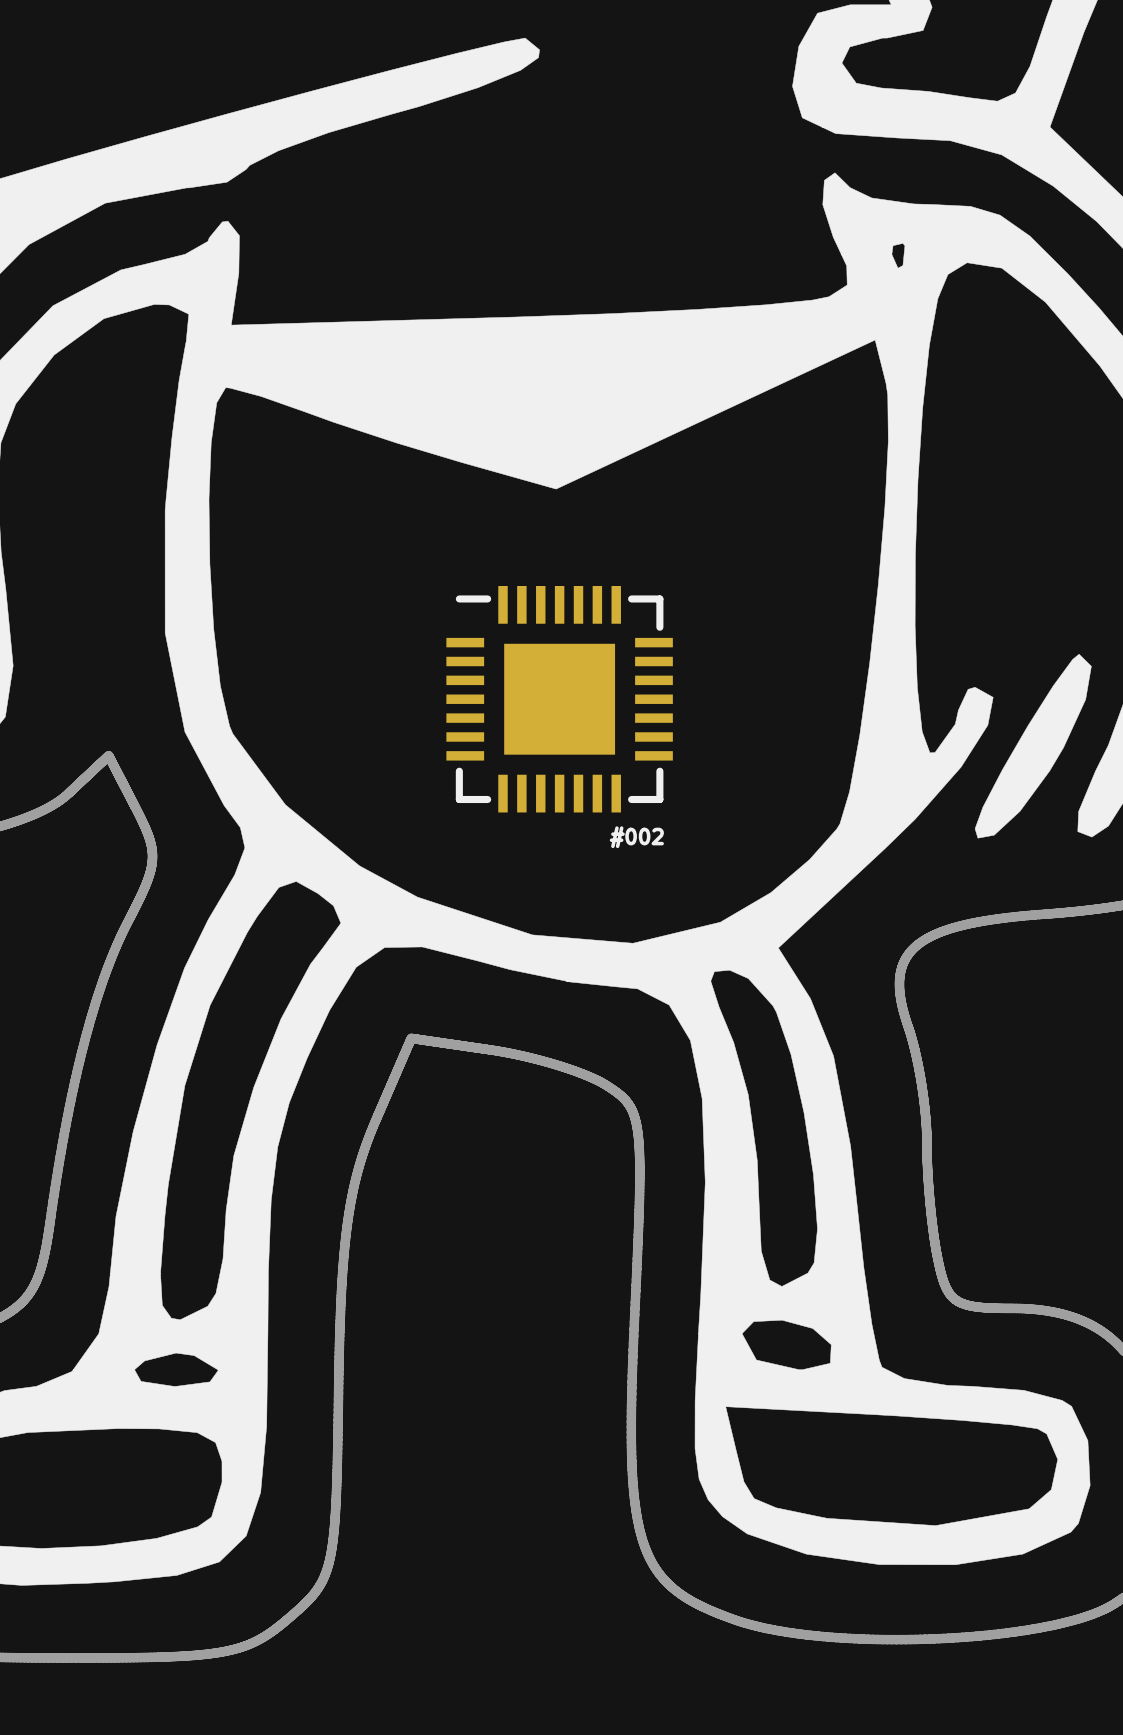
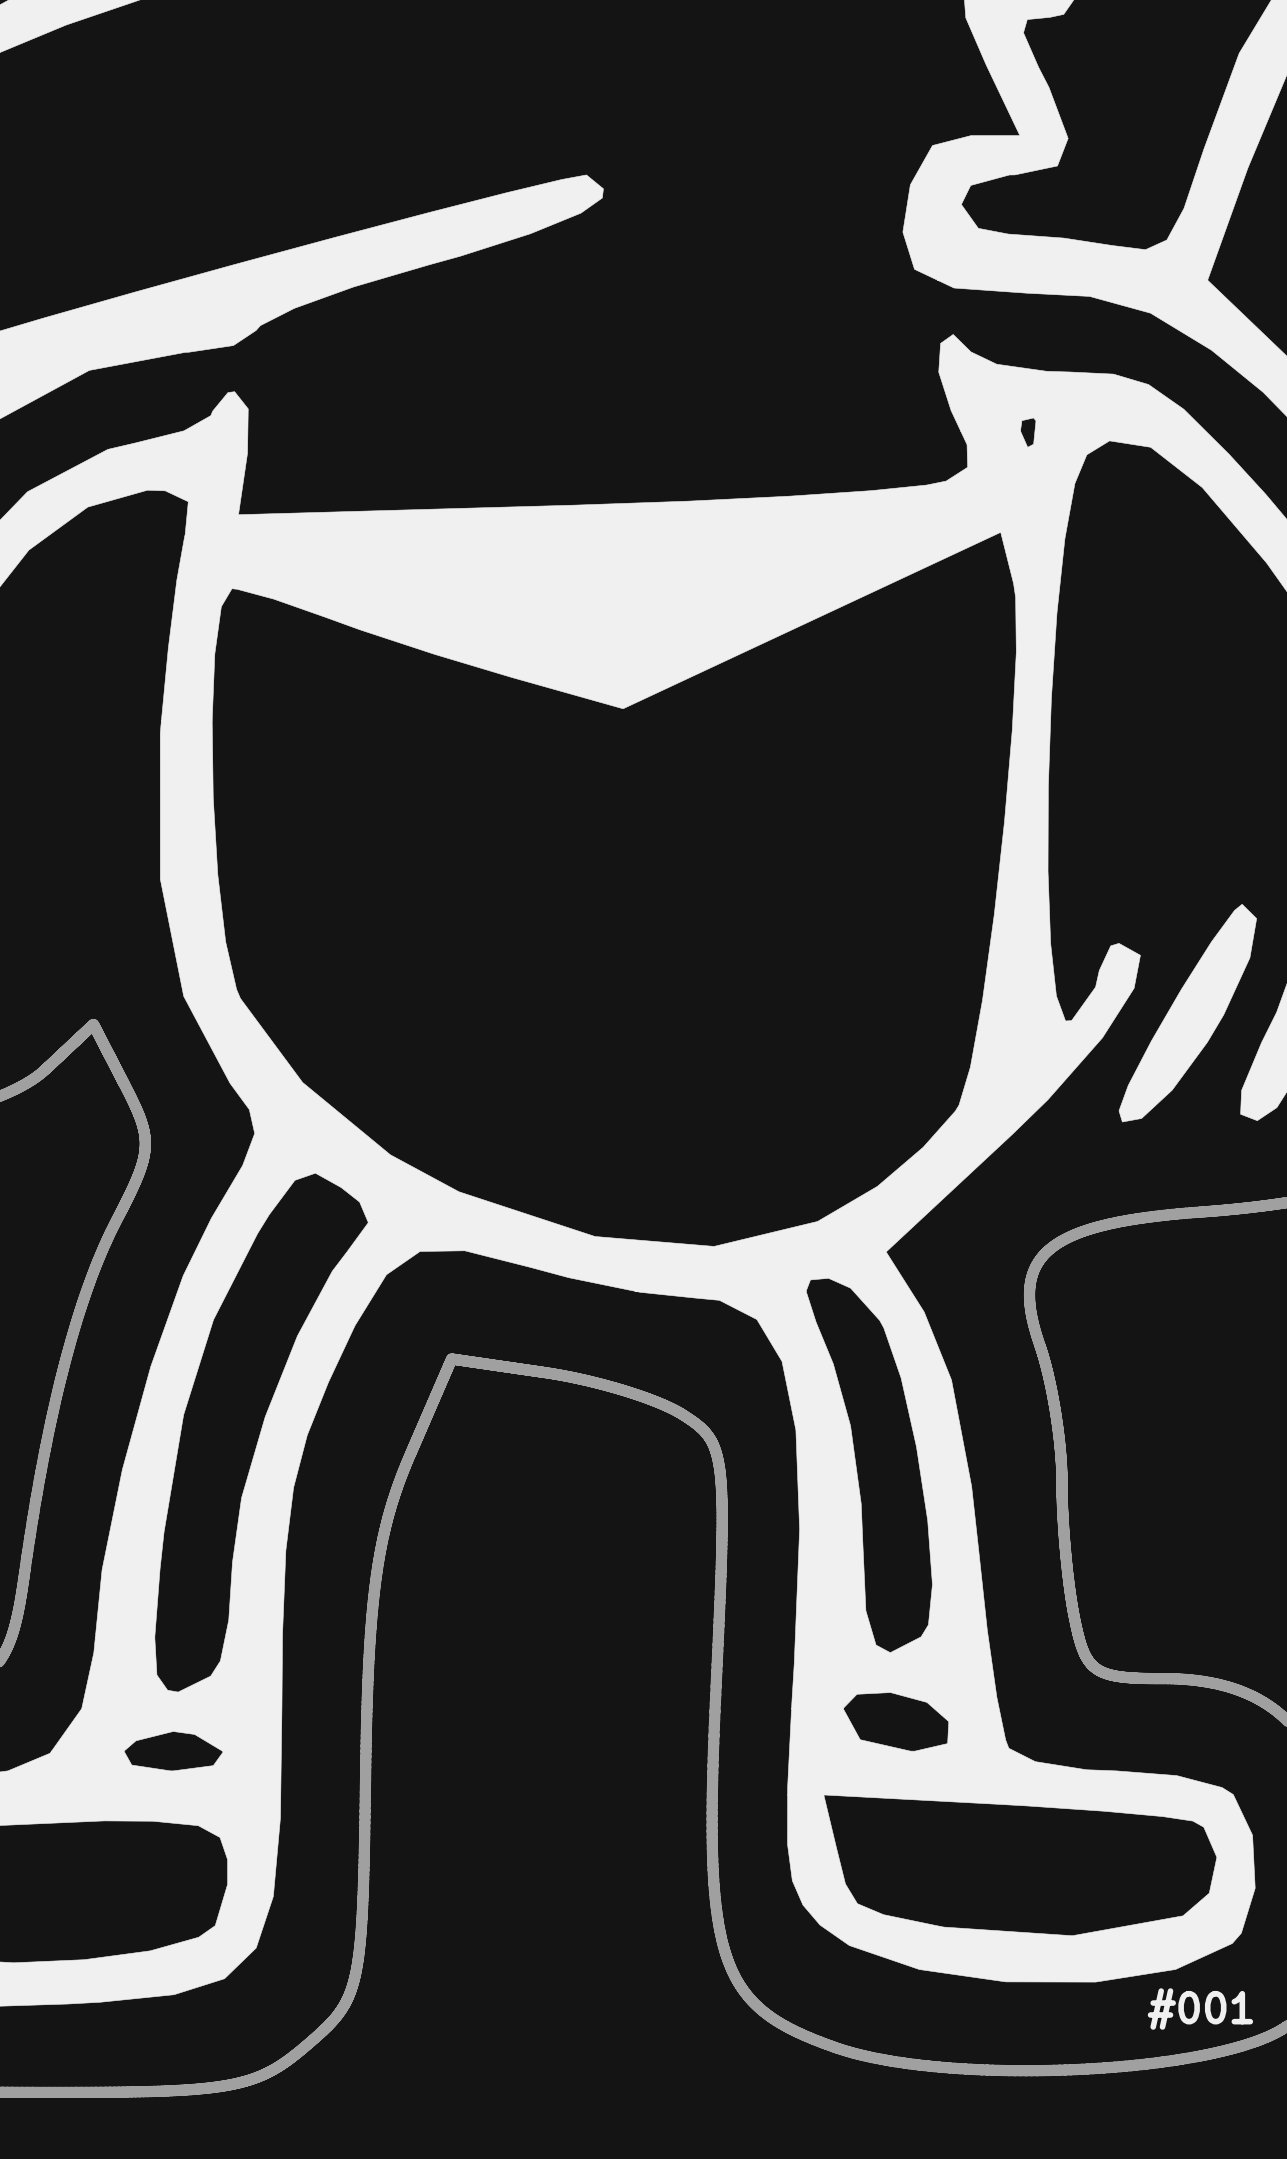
part: (559, 699) -> none
text: #002 (636, 837) -> none
text: none -> #001 (1200, 2009)

